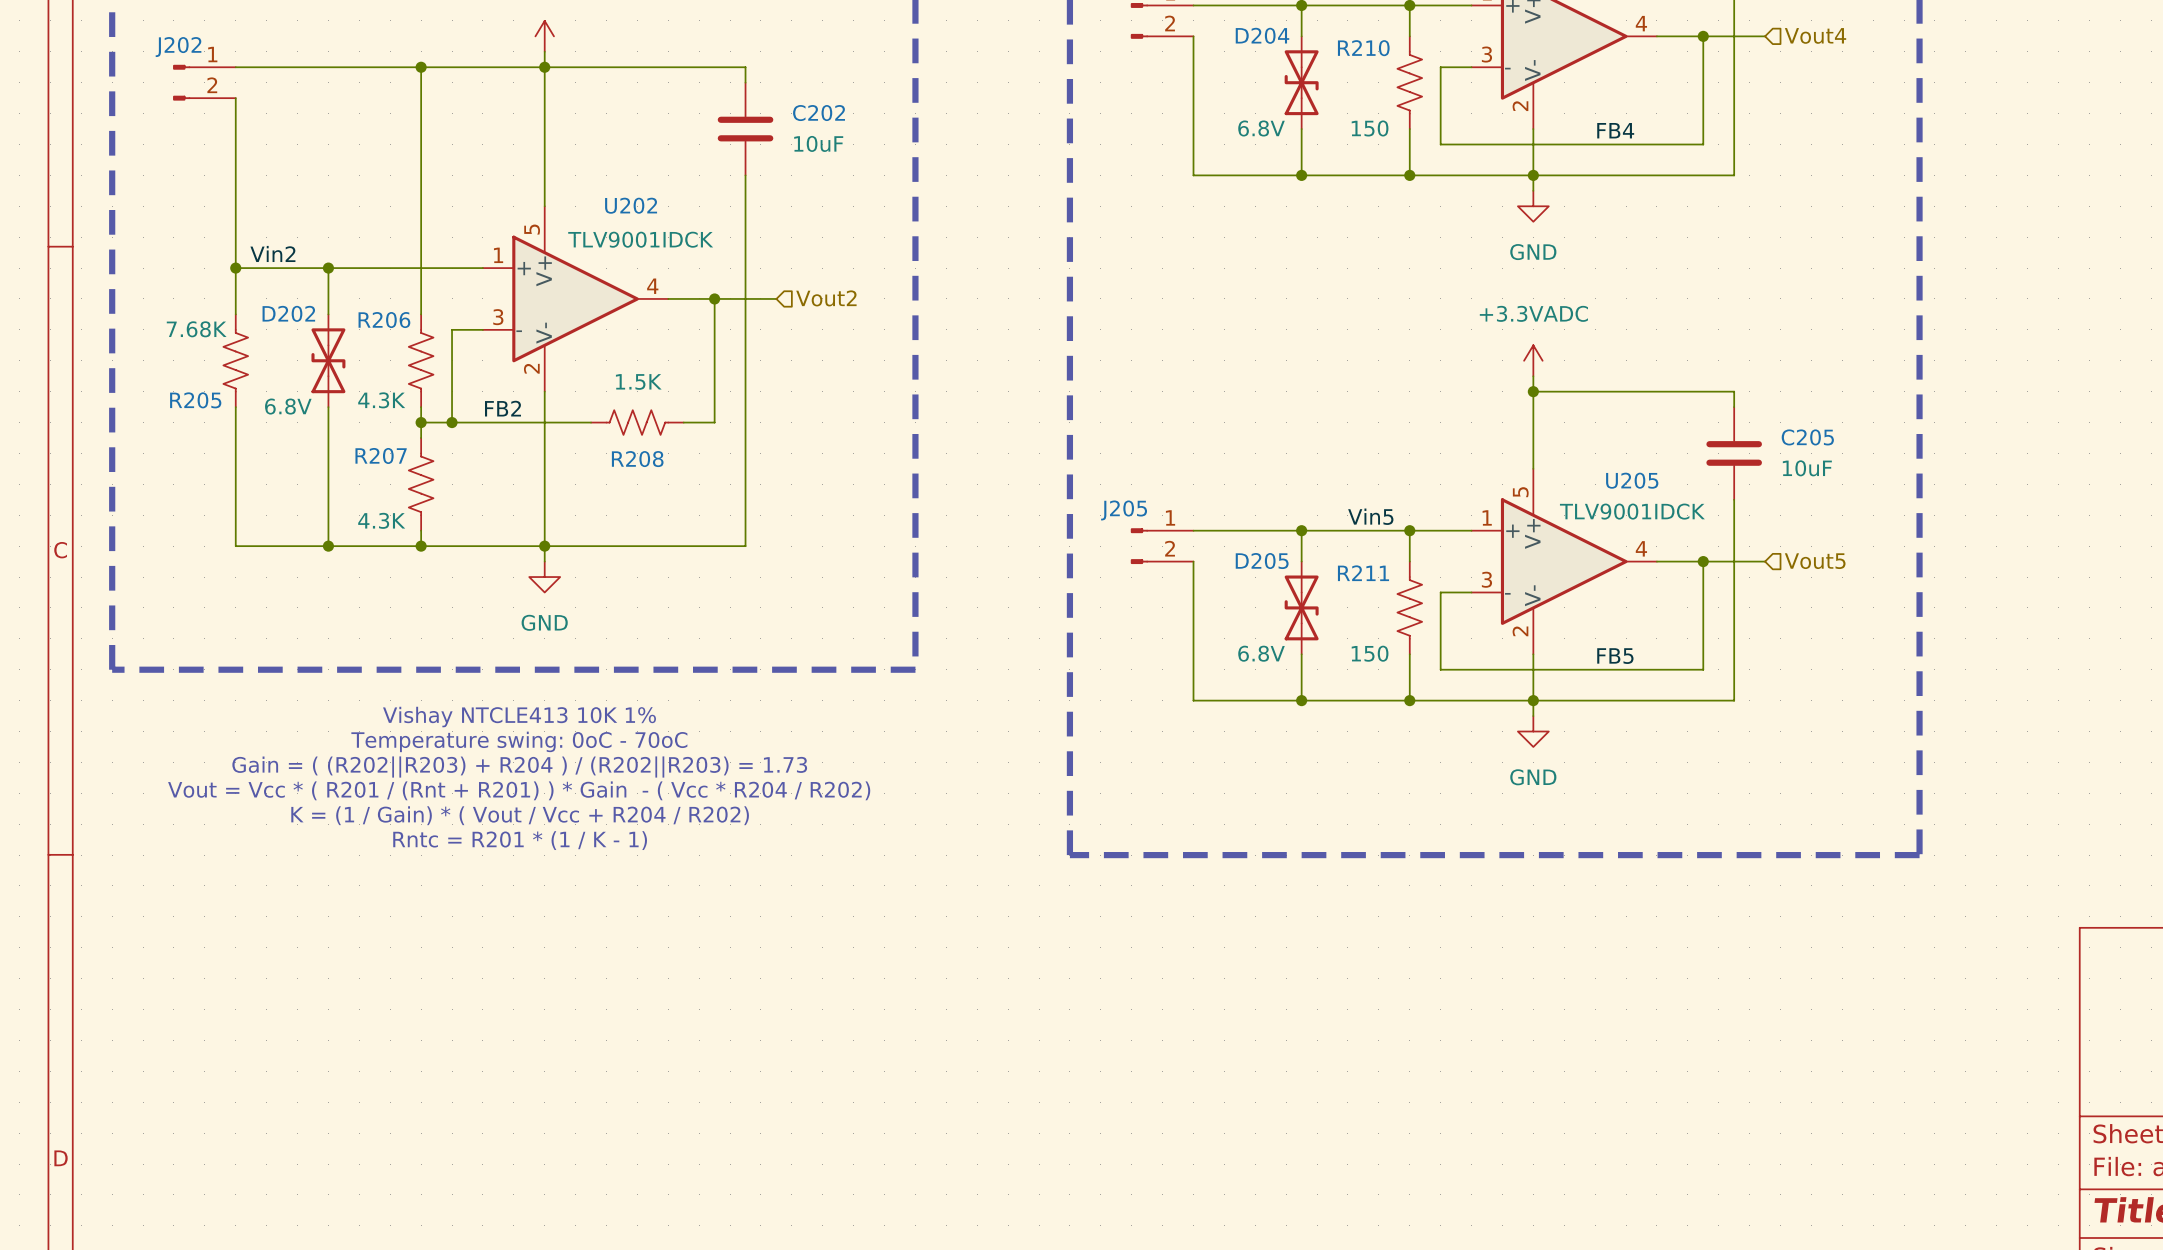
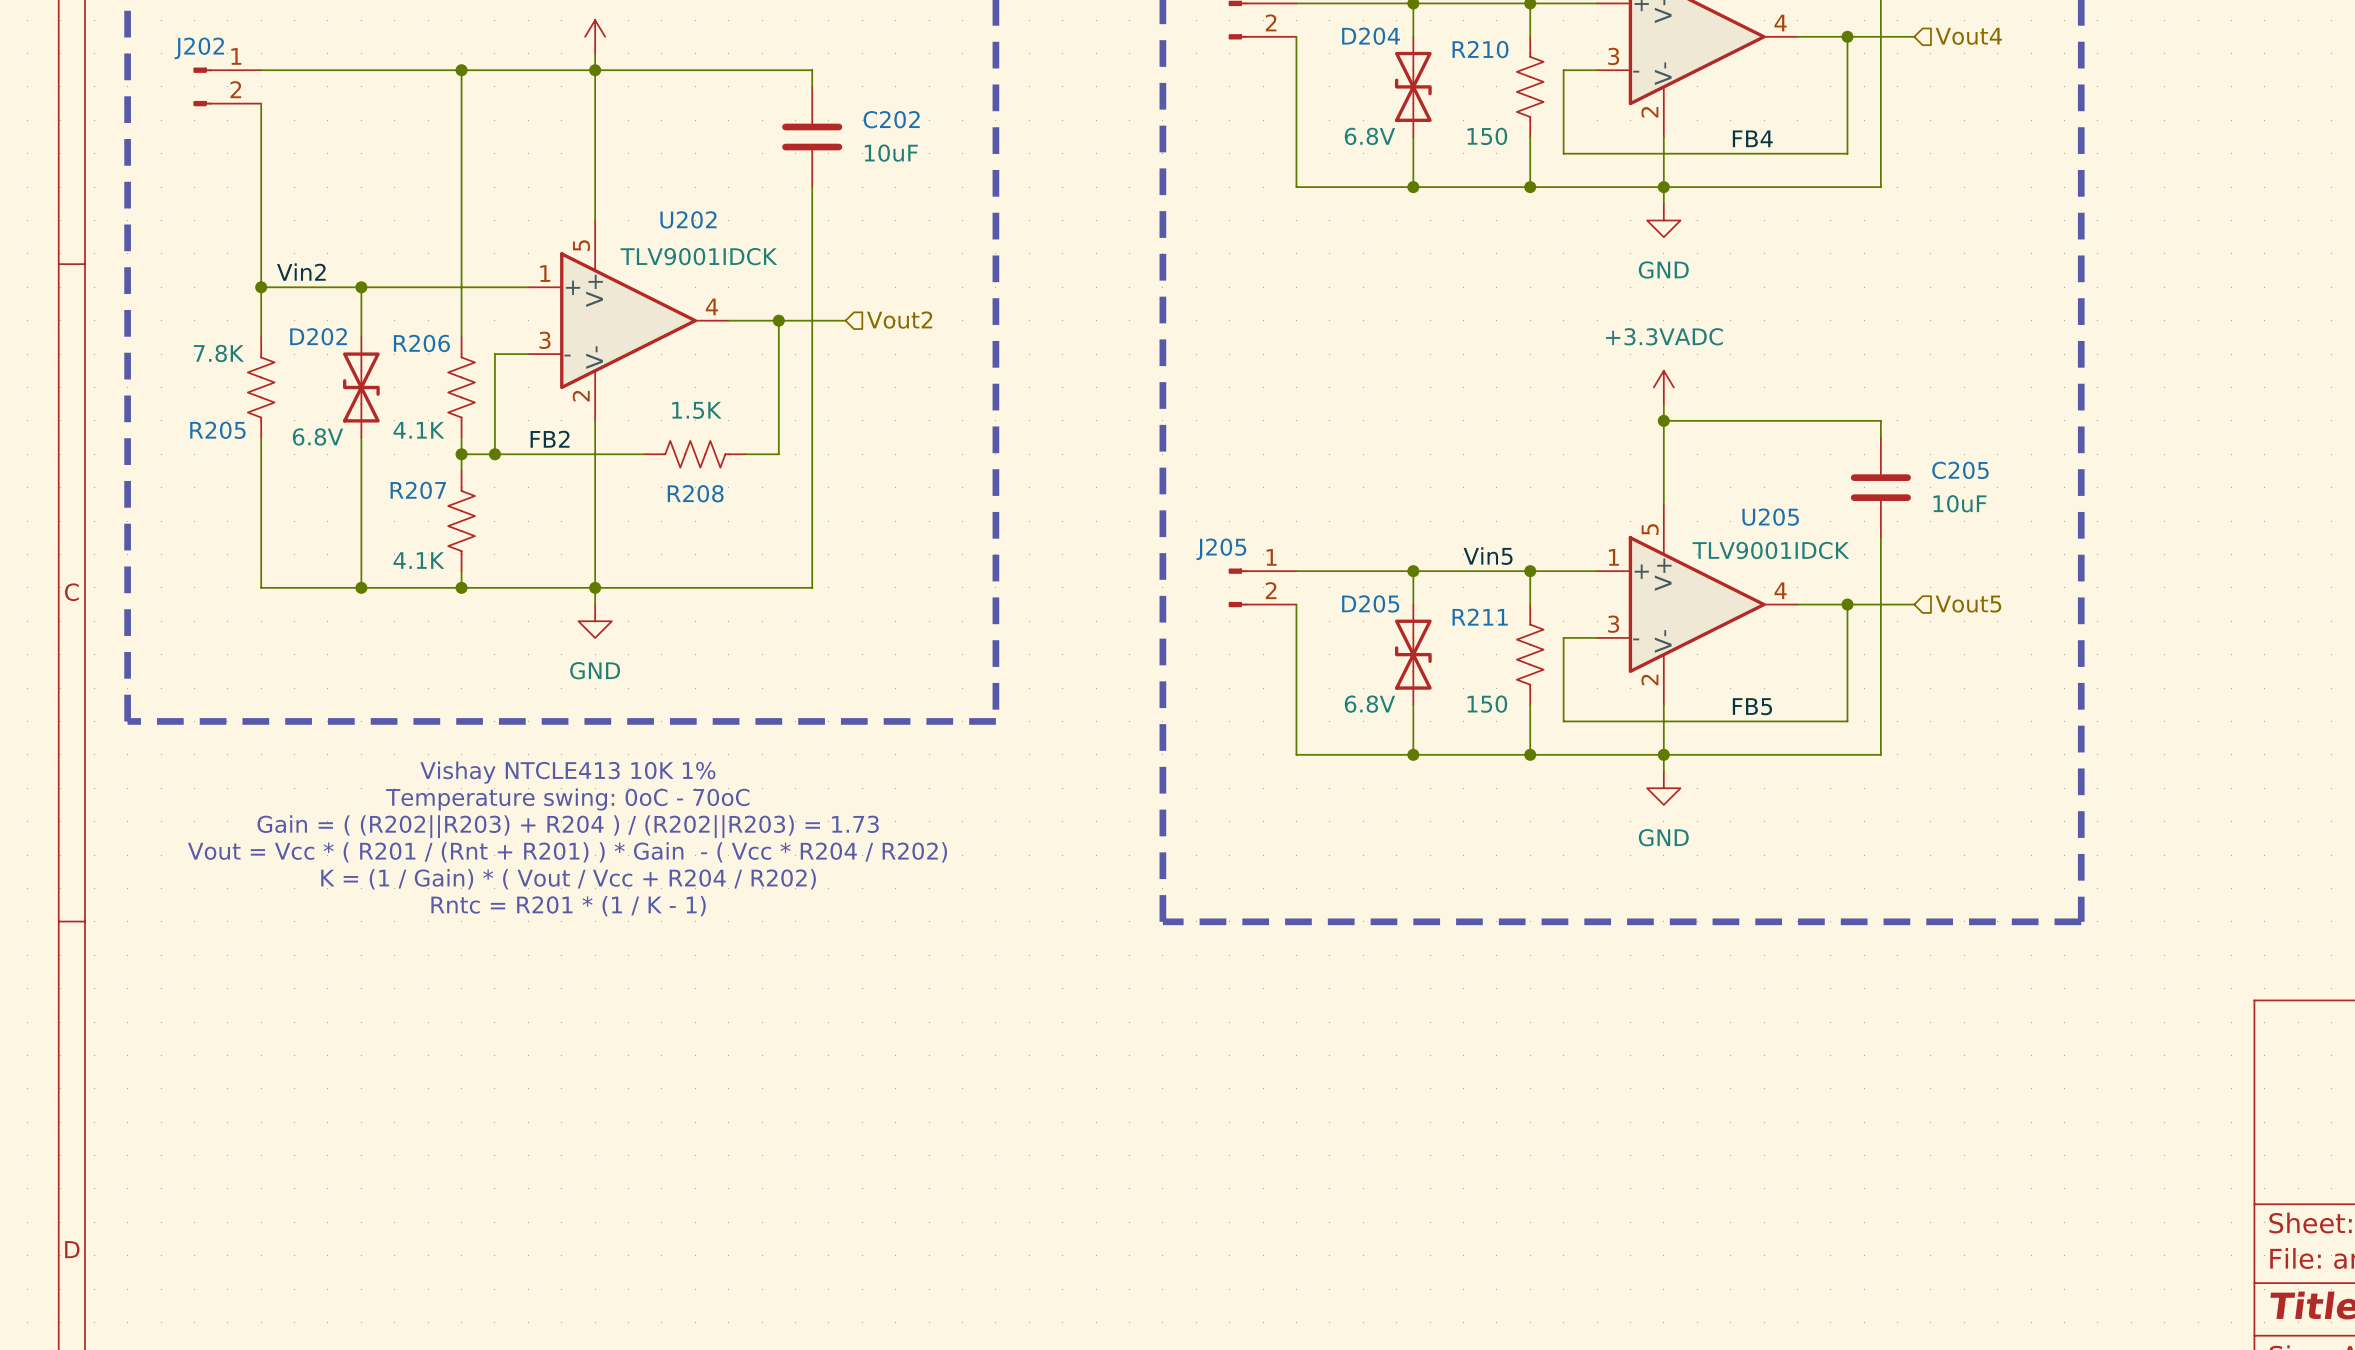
R205 value: 7.68K (196, 329) -> 7.8K (218, 353)
R206 value: 4.3K (381, 400) -> 4.1K (418, 430)
R207 value: 4.3K (381, 520) -> 4.1K (418, 560)

